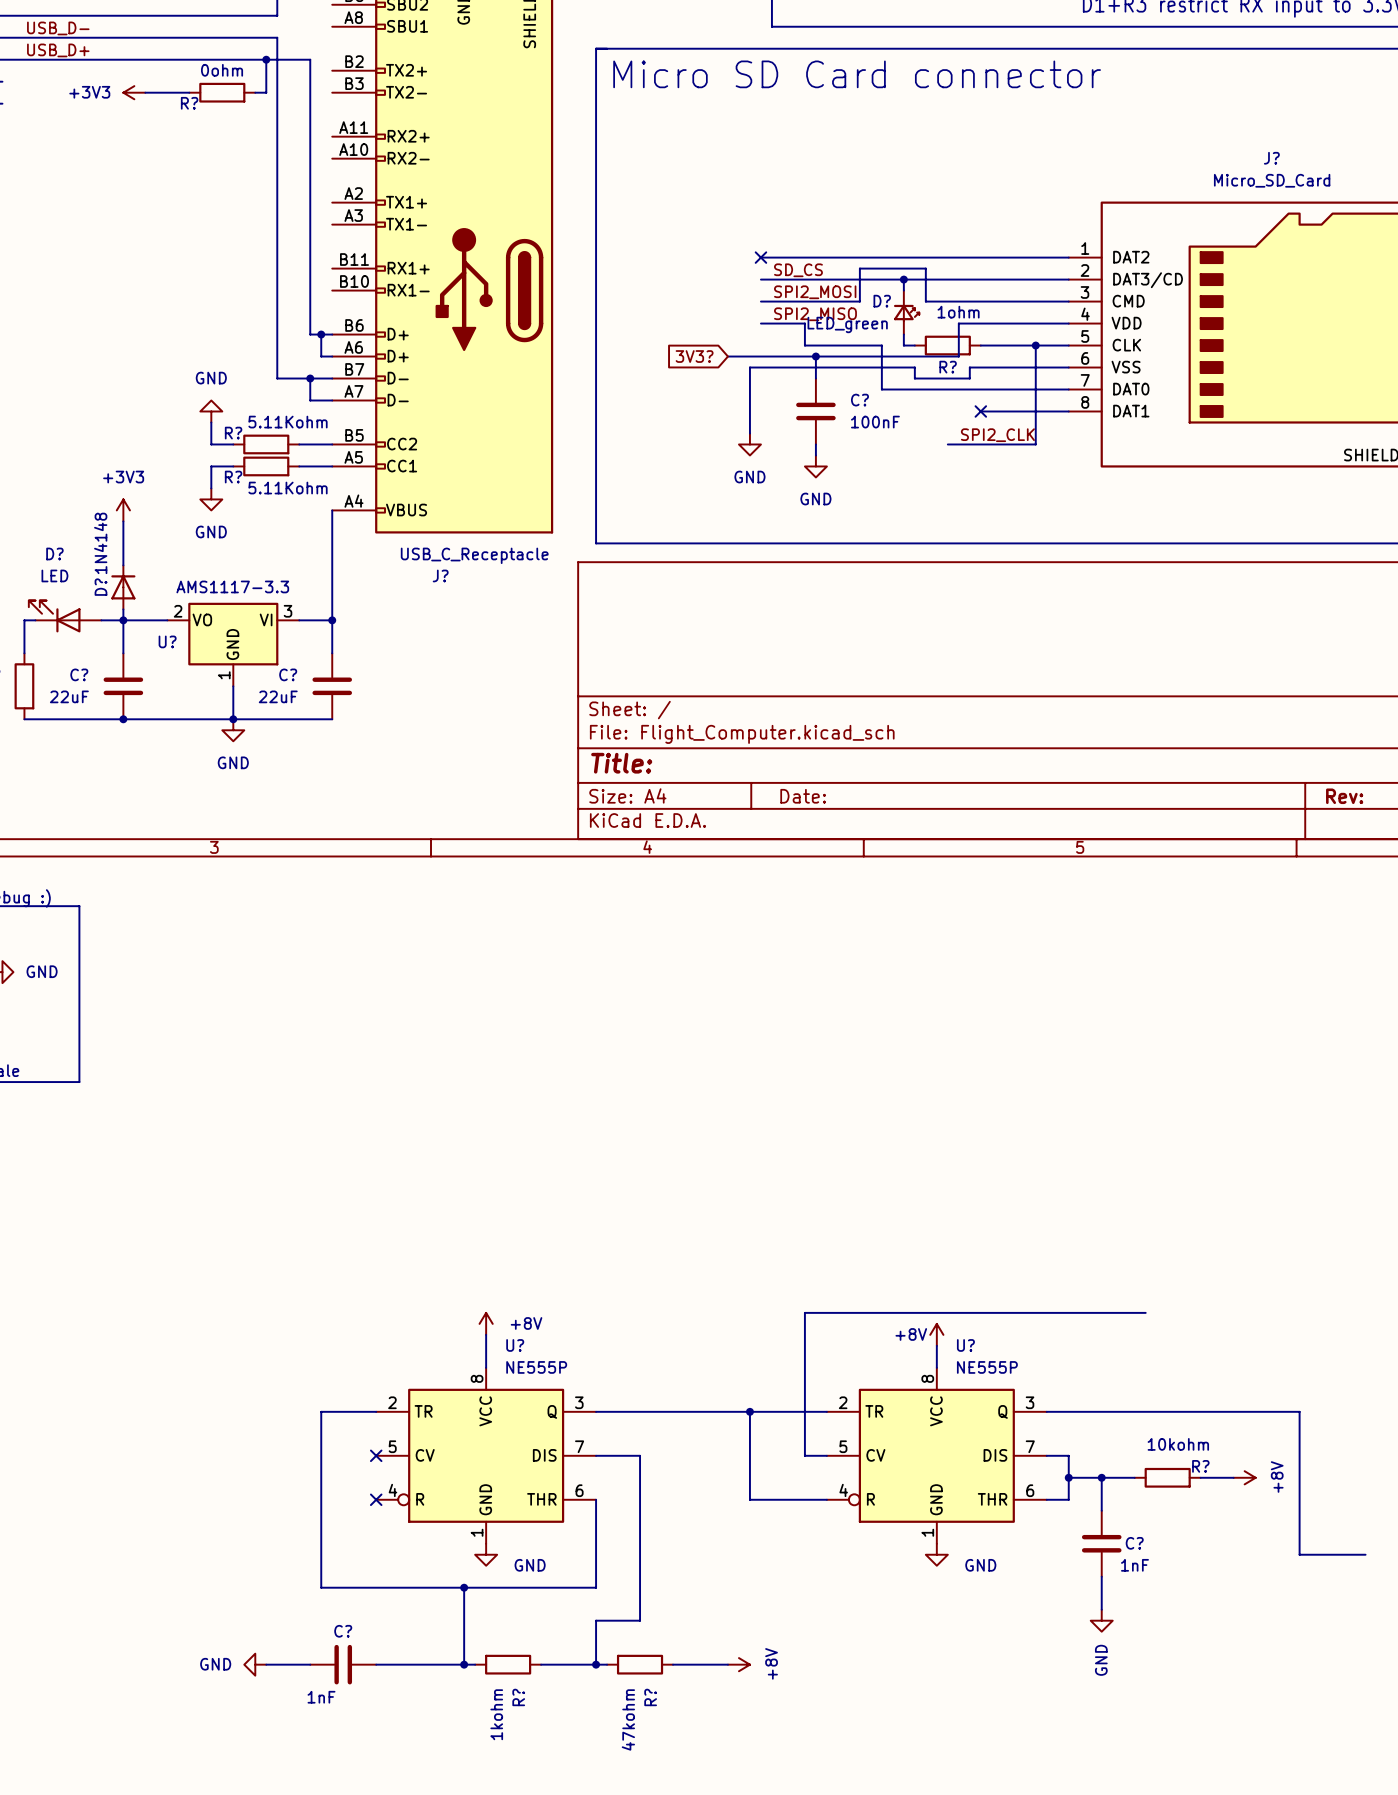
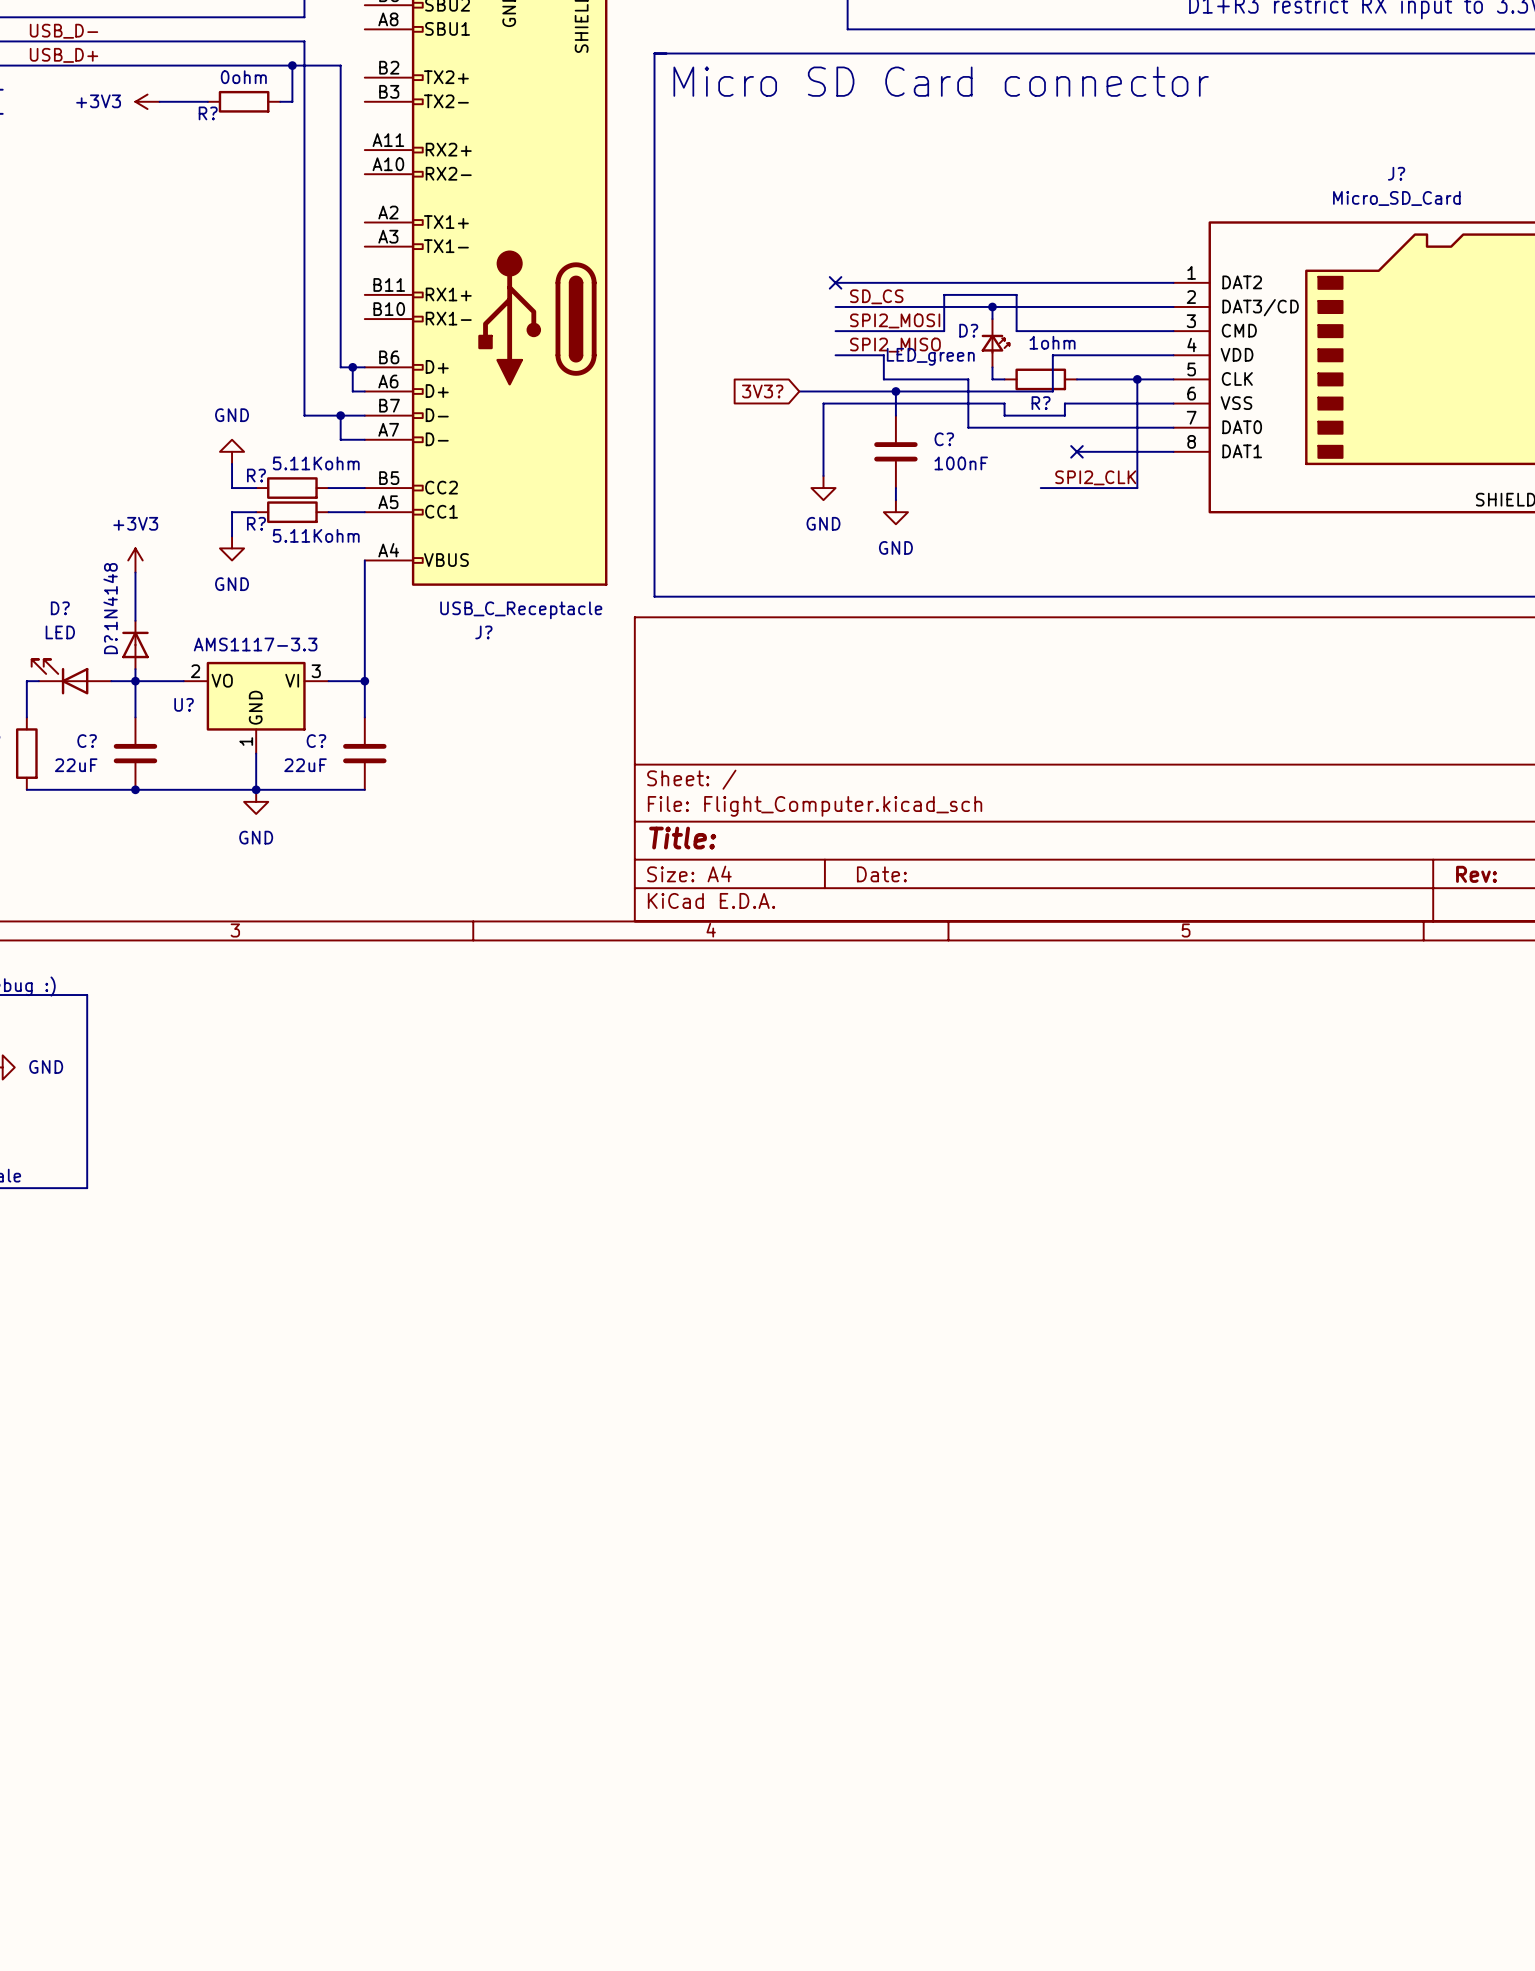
wire: (1145, 1312) (804, 1312) (804, 1455) (826, 1455) -> none
power symbol: +8V (486, 1323) -> none
wire: (486, 1334) (486, 1367) -> none
power symbol: +8V (936, 1334) -> none
wire: (936, 1345) (936, 1367) -> none
wire: (376, 1411) (321, 1411) (321, 1587) (596, 1587) (596, 1499) -> none
wire: (596, 1411) (826, 1411) -> none
wire: (749, 1411) (749, 1499) (826, 1499) -> none
junction: (749, 1411) -> none
wire: (1046, 1411) (1299, 1411) (1299, 1554) (1365, 1554) -> none
no-connect mark: (376, 1455) -> none
U?: NE555P (486, 1455) -> none
wire: (596, 1455) (640, 1455) (640, 1620) (596, 1620) (596, 1664) -> none
U?: NE555P (936, 1455) -> none
wire: (1046, 1455) (1068, 1455) (1068, 1499) (1046, 1499) -> none
wire: (1068, 1477) (1134, 1477) -> none
junction: (1068, 1477) -> none
wire: (1101, 1477) (1101, 1510) -> none
junction: (1101, 1477) -> none
R?: 10kohm (1167, 1477) -> none
wire: (1200, 1477) (1233, 1477) -> none
power symbol: +8V (1244, 1477) -> none
no-connect mark: (376, 1499) -> none
C?: 1nF (1101, 1543) -> none
power symbol: GND (486, 1554) -> none
power symbol: GND (936, 1554) -> none
wire: (1101, 1576) (1101, 1609) -> none
wire: (464, 1587) (464, 1664) -> none
junction: (464, 1587) -> none
power symbol: GND (1101, 1620) -> none
power symbol: GND (255, 1664) -> none
wire: (266, 1664) (310, 1664) -> none
C?: 1nF (343, 1664) -> none
wire: (376, 1664) (475, 1664) -> none
junction: (464, 1664) -> none
R?: 1kohm (508, 1664) -> none
wire: (541, 1664) (607, 1664) -> none
junction: (596, 1664) -> none
R?: 47kohm (640, 1664) -> none
wire: (673, 1664) (727, 1664) -> none
power symbol: +8V (738, 1664) -> none

